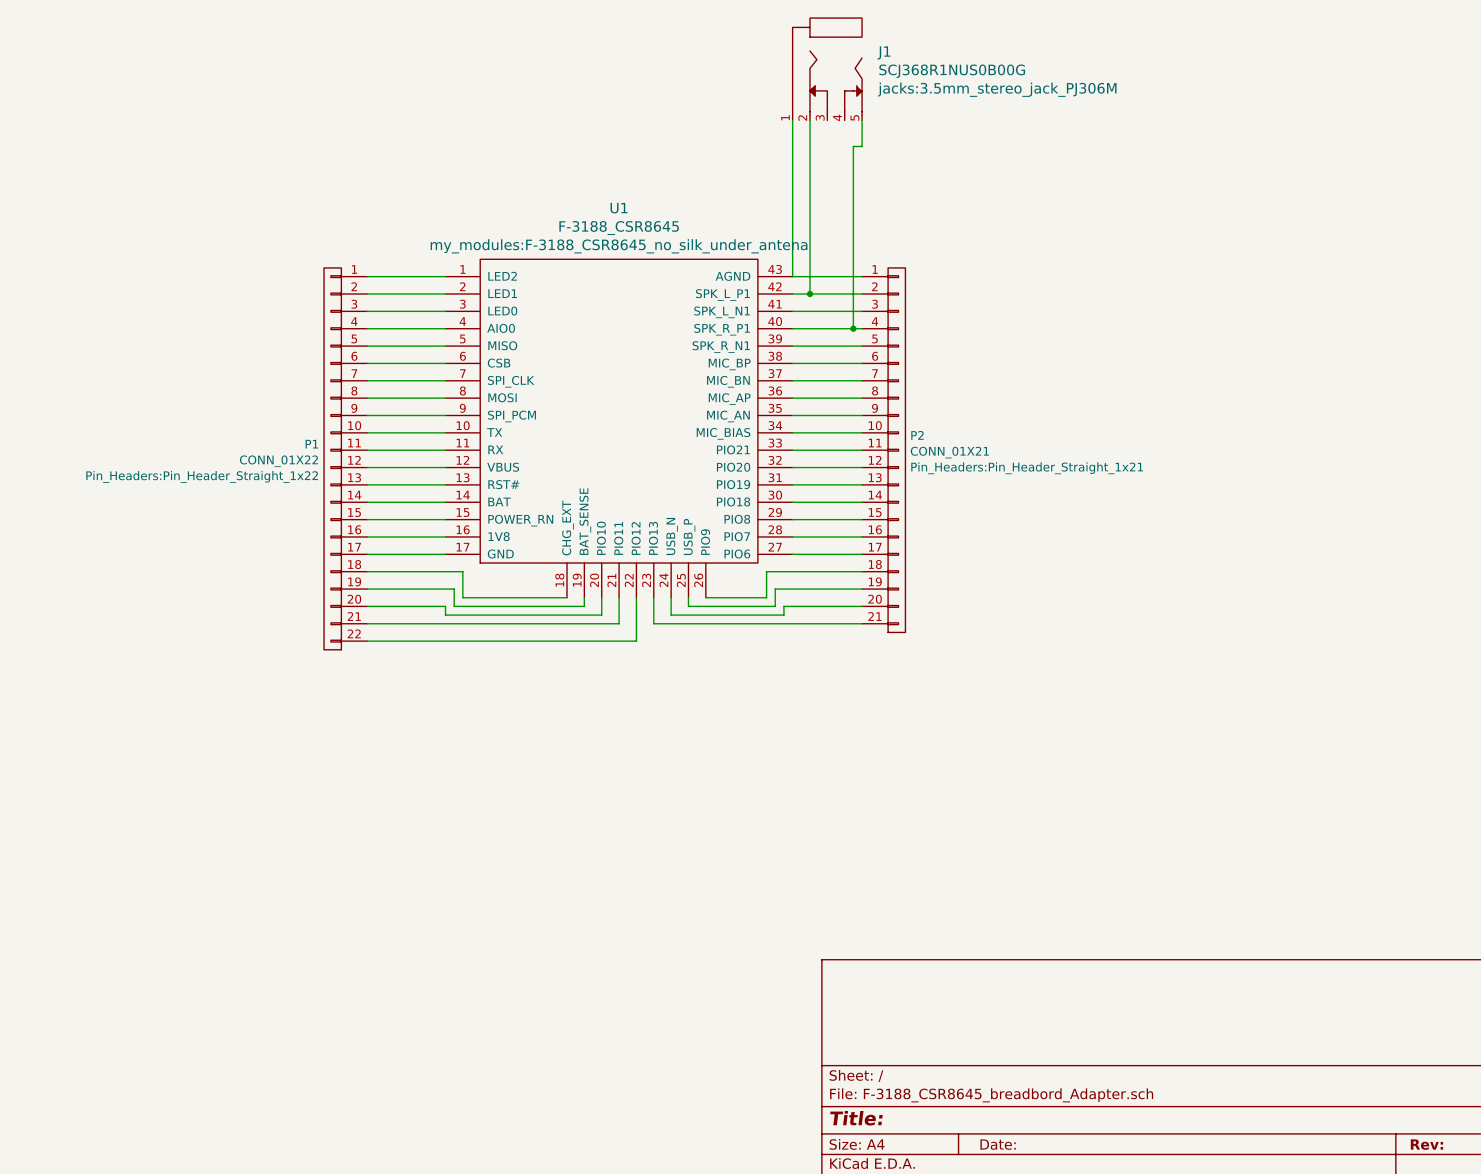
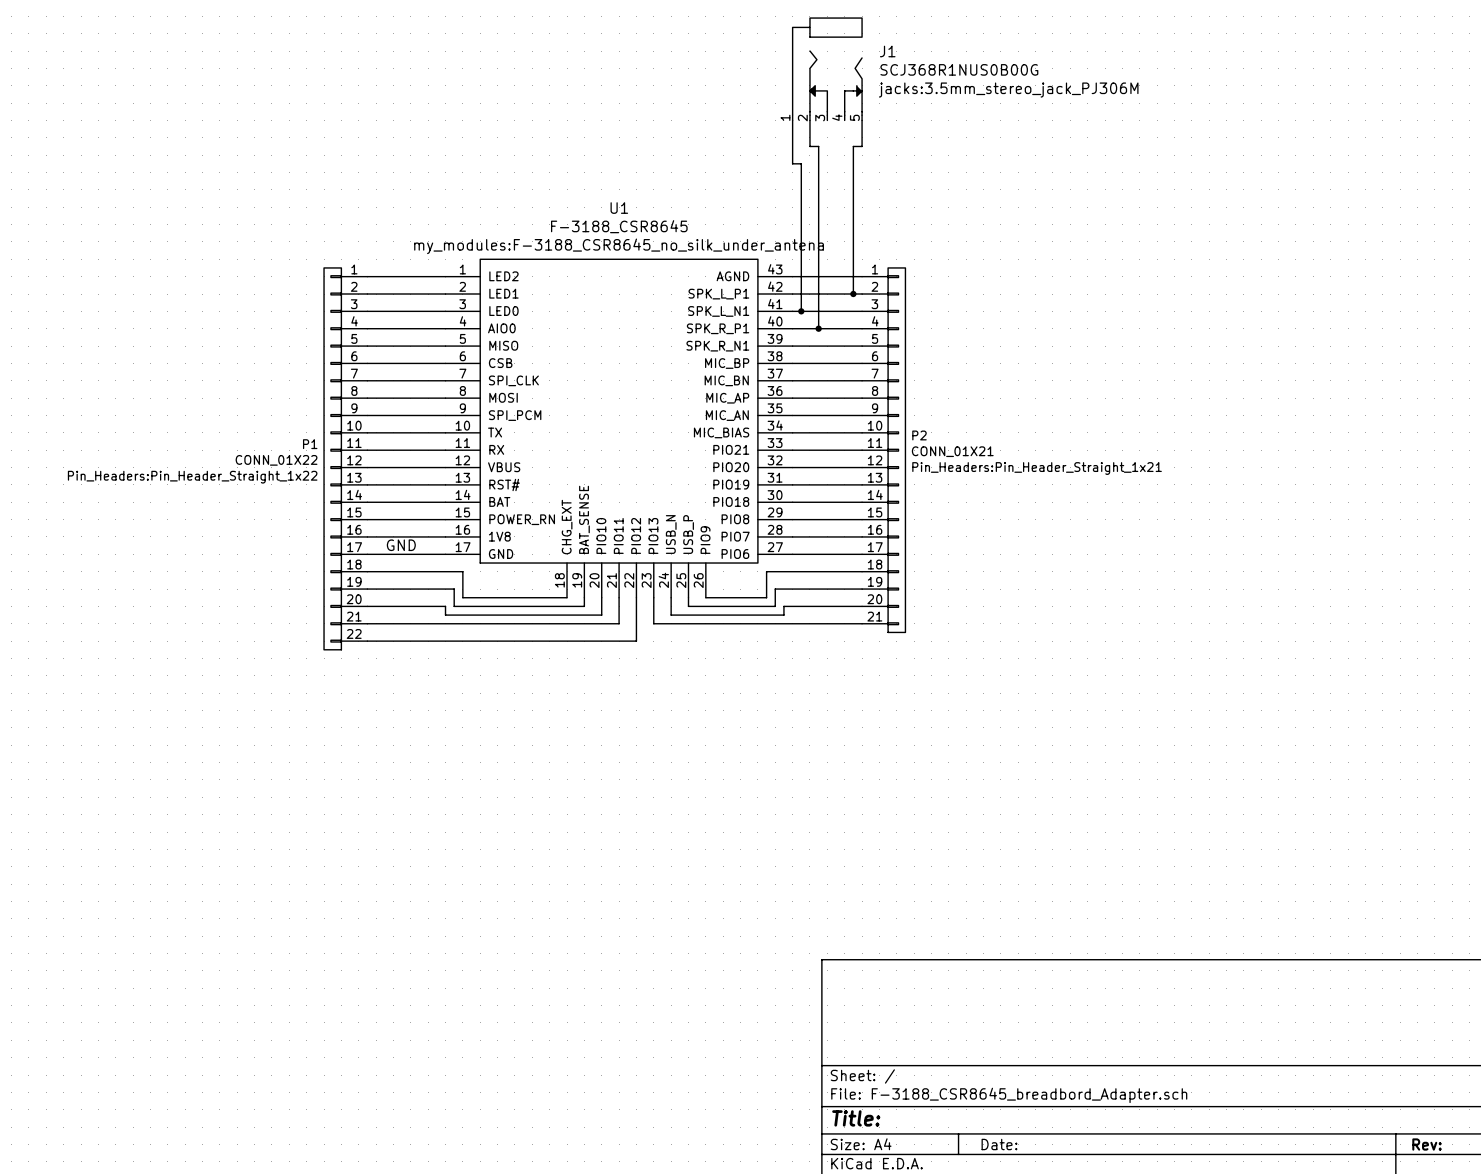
wire: (809, 146) (809, 294) -> (809, 146) (818, 146) (818, 328)
wire: (792, 163) (792, 276) -> (792, 163) (801, 163) (801, 311)
junction: (809, 294) -> none
wire: (853, 294) (853, 328) -> none
junction: none -> (853, 294)
junction: none -> (801, 311)
junction: none -> (818, 328)
junction: (853, 328) -> none
label: none -> GND (401, 545)

